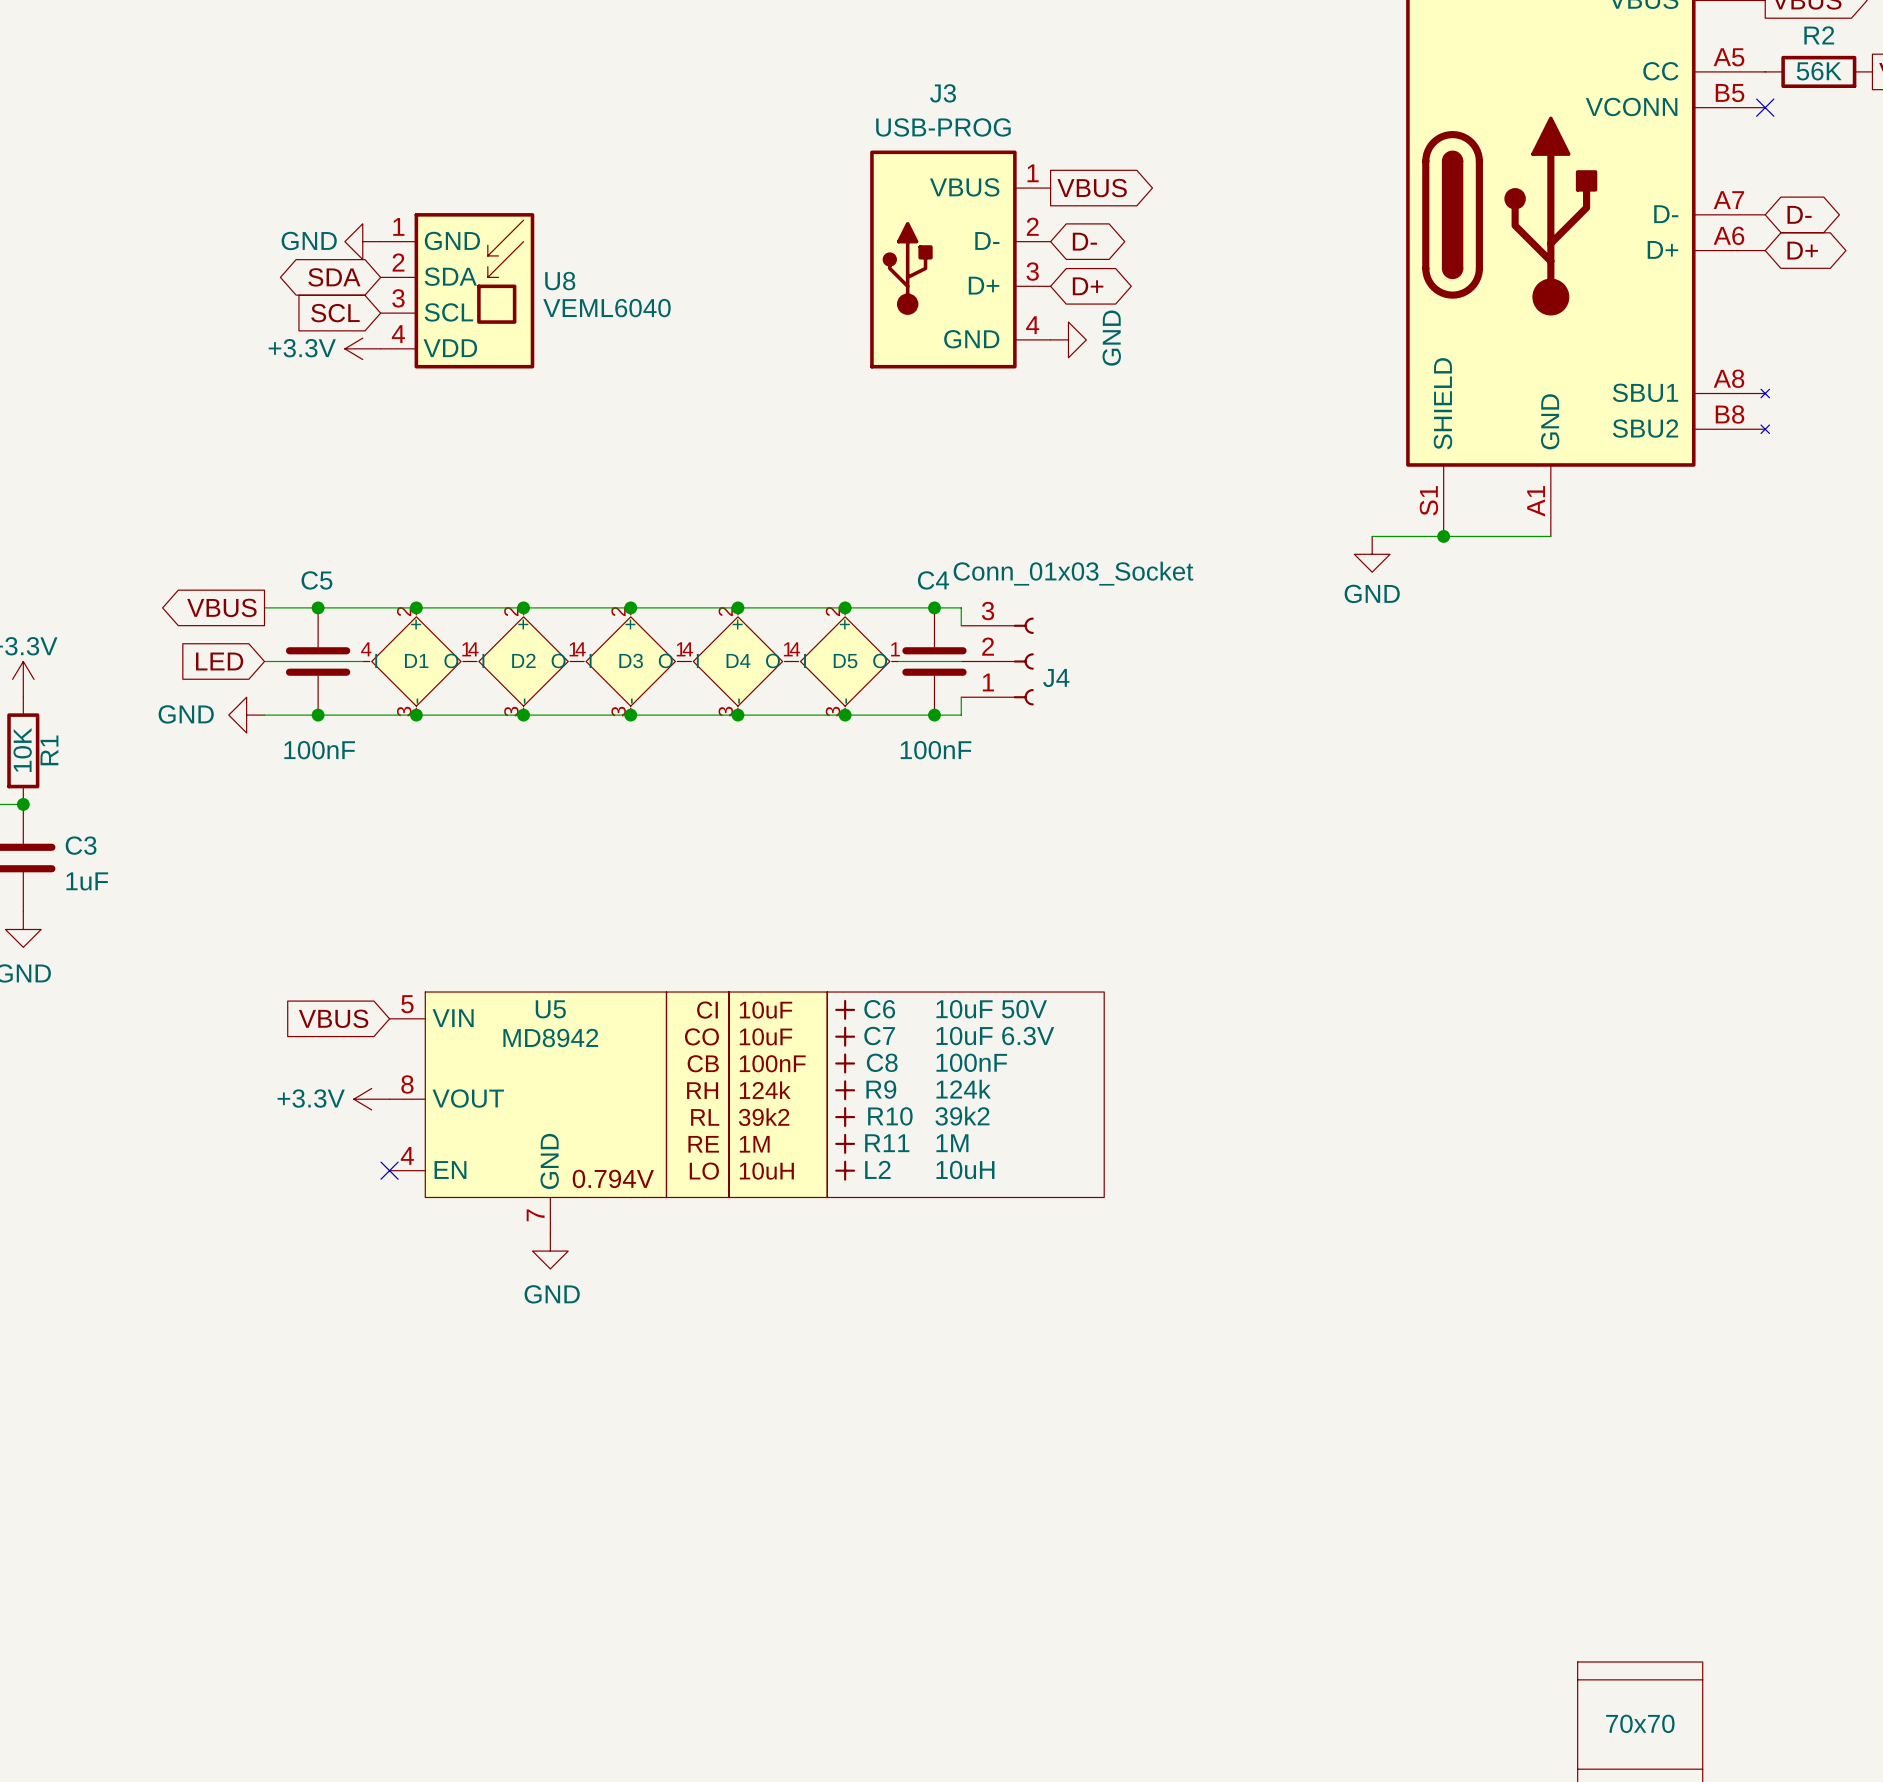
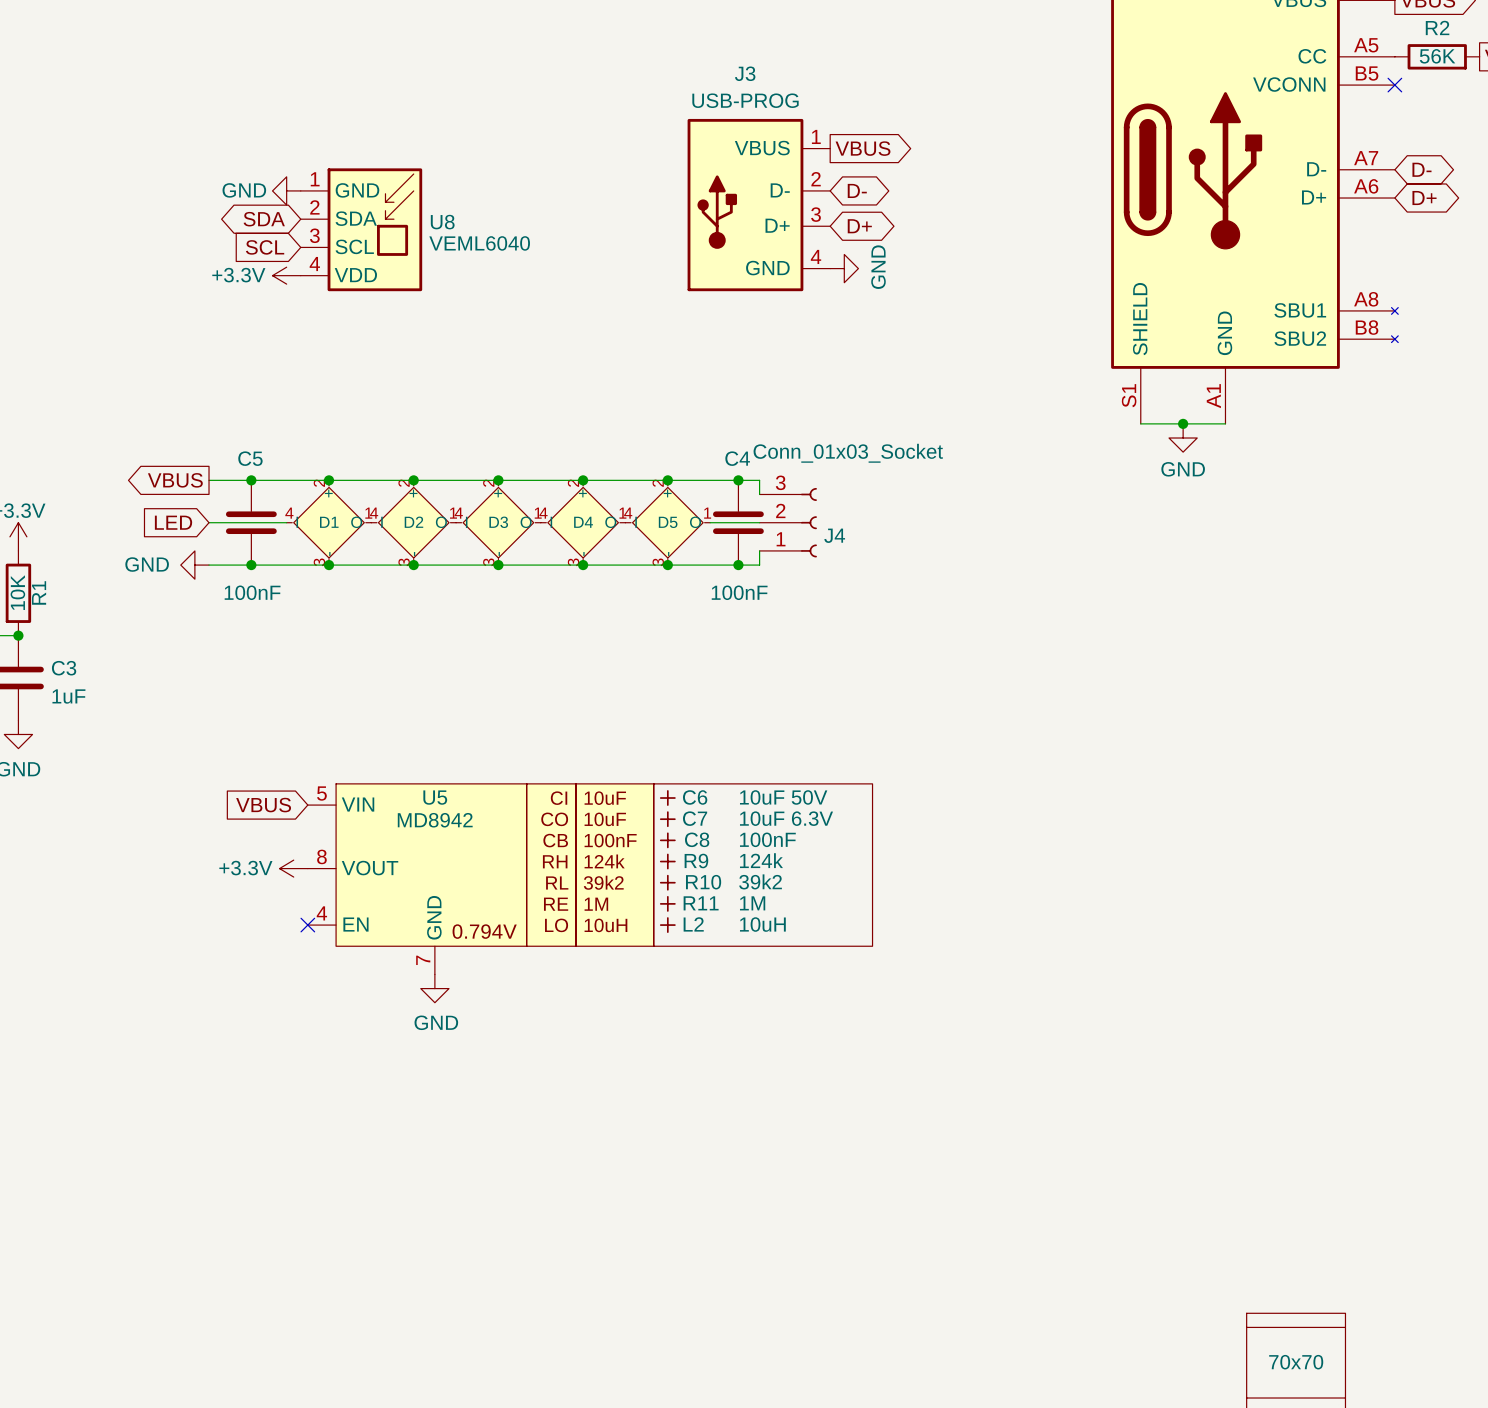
wire: (1372, 536) (1443, 536) -> none
junction position: (1443, 536) -> (1183, 423)
power symbol position: GND (1372, 554) -> GND (1183, 438)

